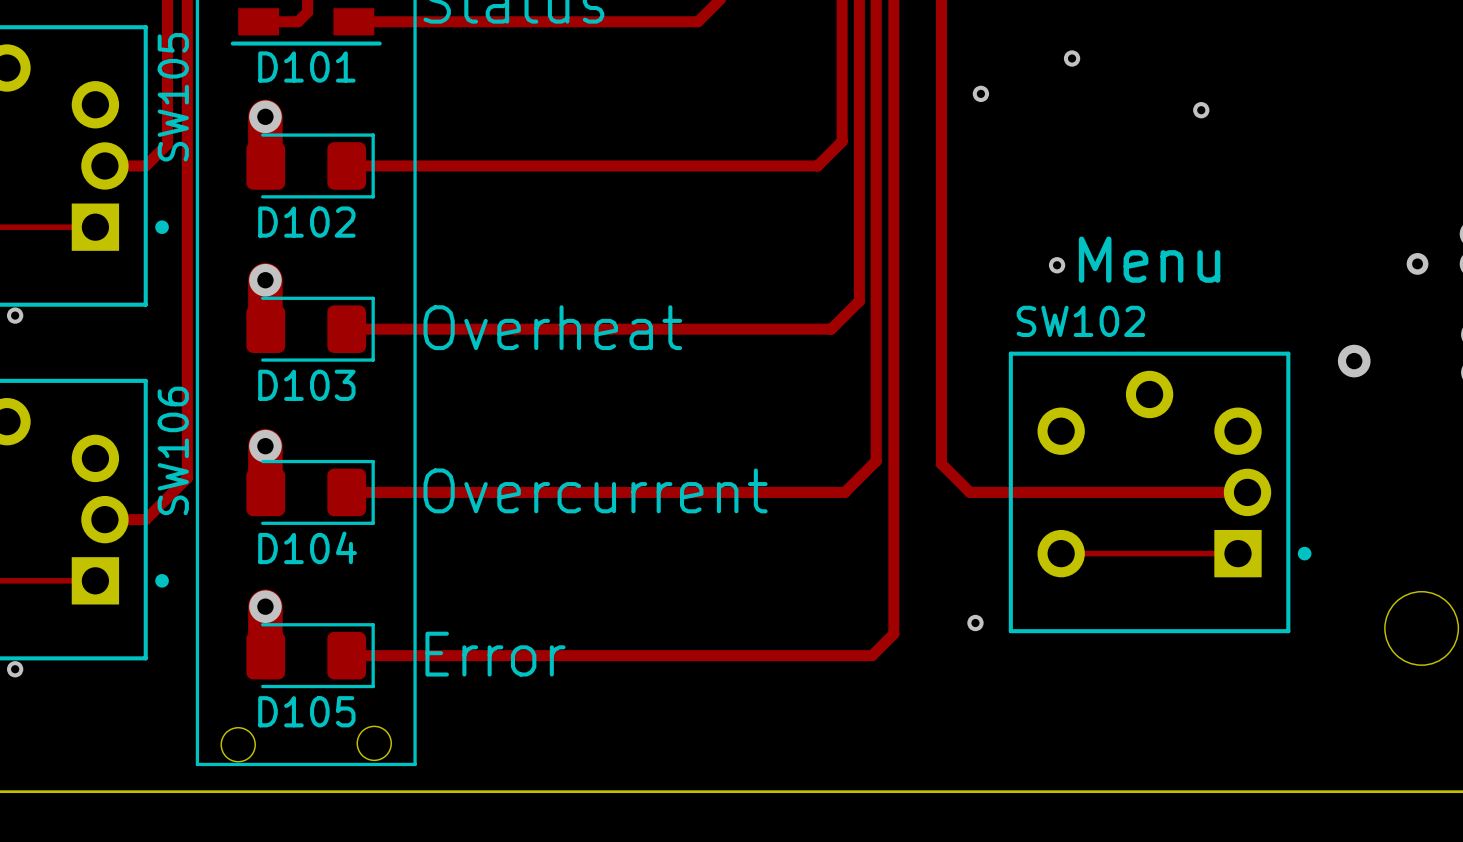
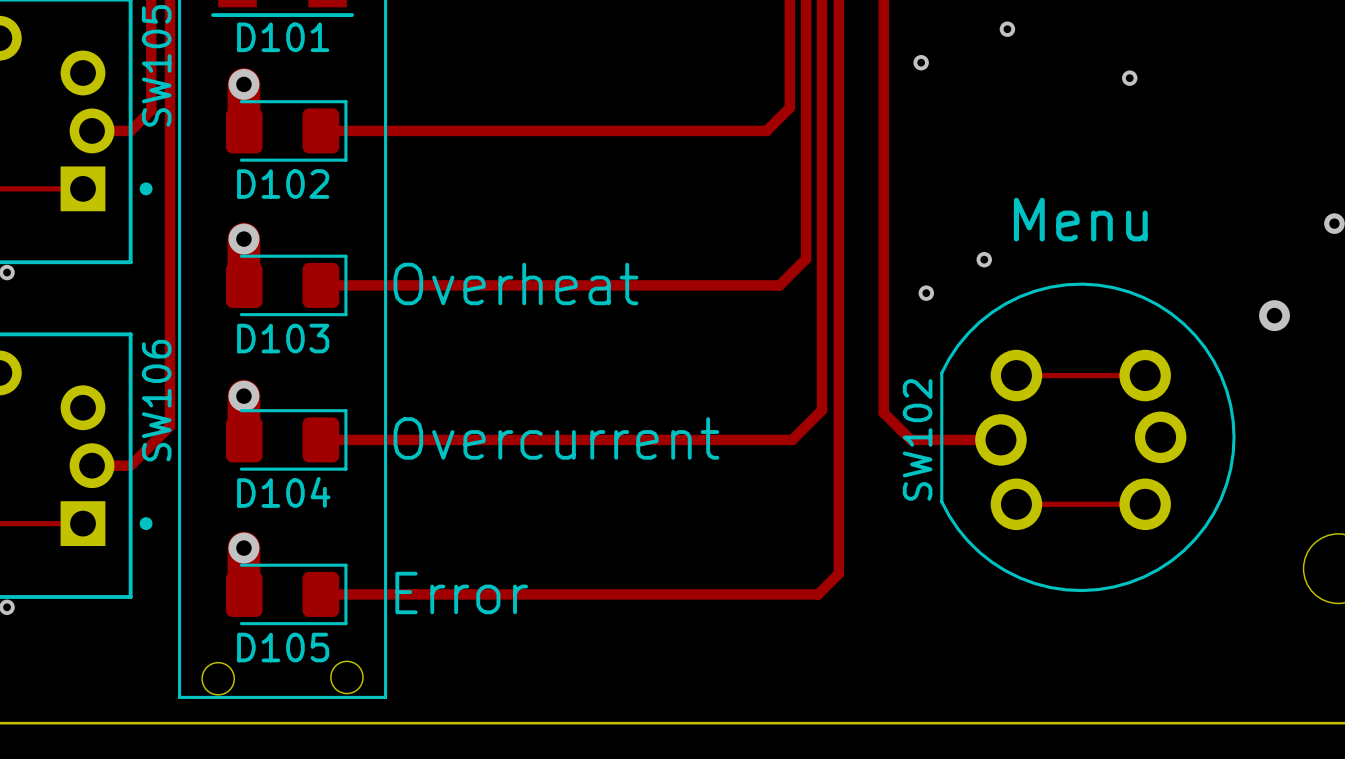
via position: (1057, 265) -> (984, 259)
SW102 name position: SW102 (1080, 321) -> SW102 (917, 439)
via: none -> (926, 293)
SW102 footprint: [1008, 351, 1312, 634] -> [940, 282, 1236, 593]
track: none -> (1019, 375) (1147, 375)
track: (1065, 492) (1247, 492) -> none
track: (1061, 553) (1238, 553) -> none
track: none -> (1019, 504) (1147, 504)
via: (975, 623) -> none

